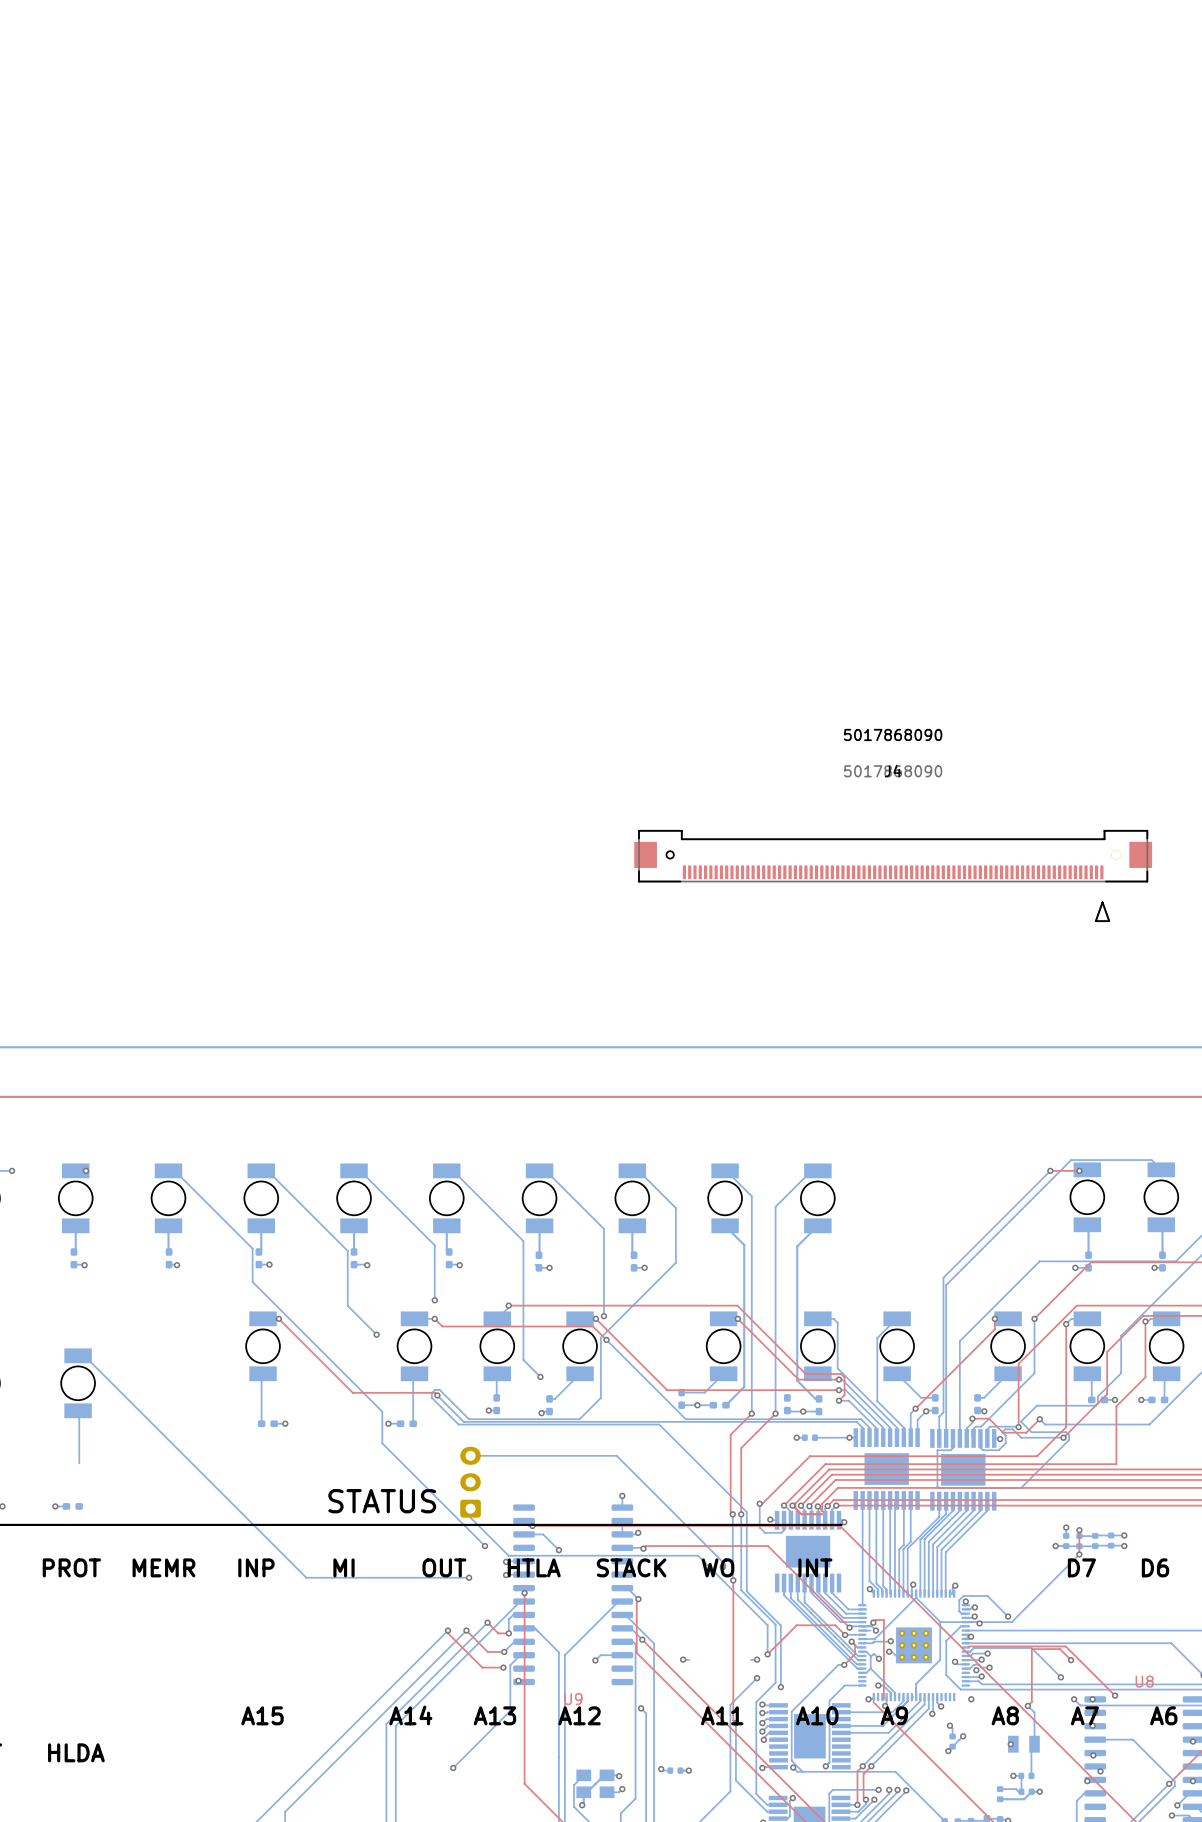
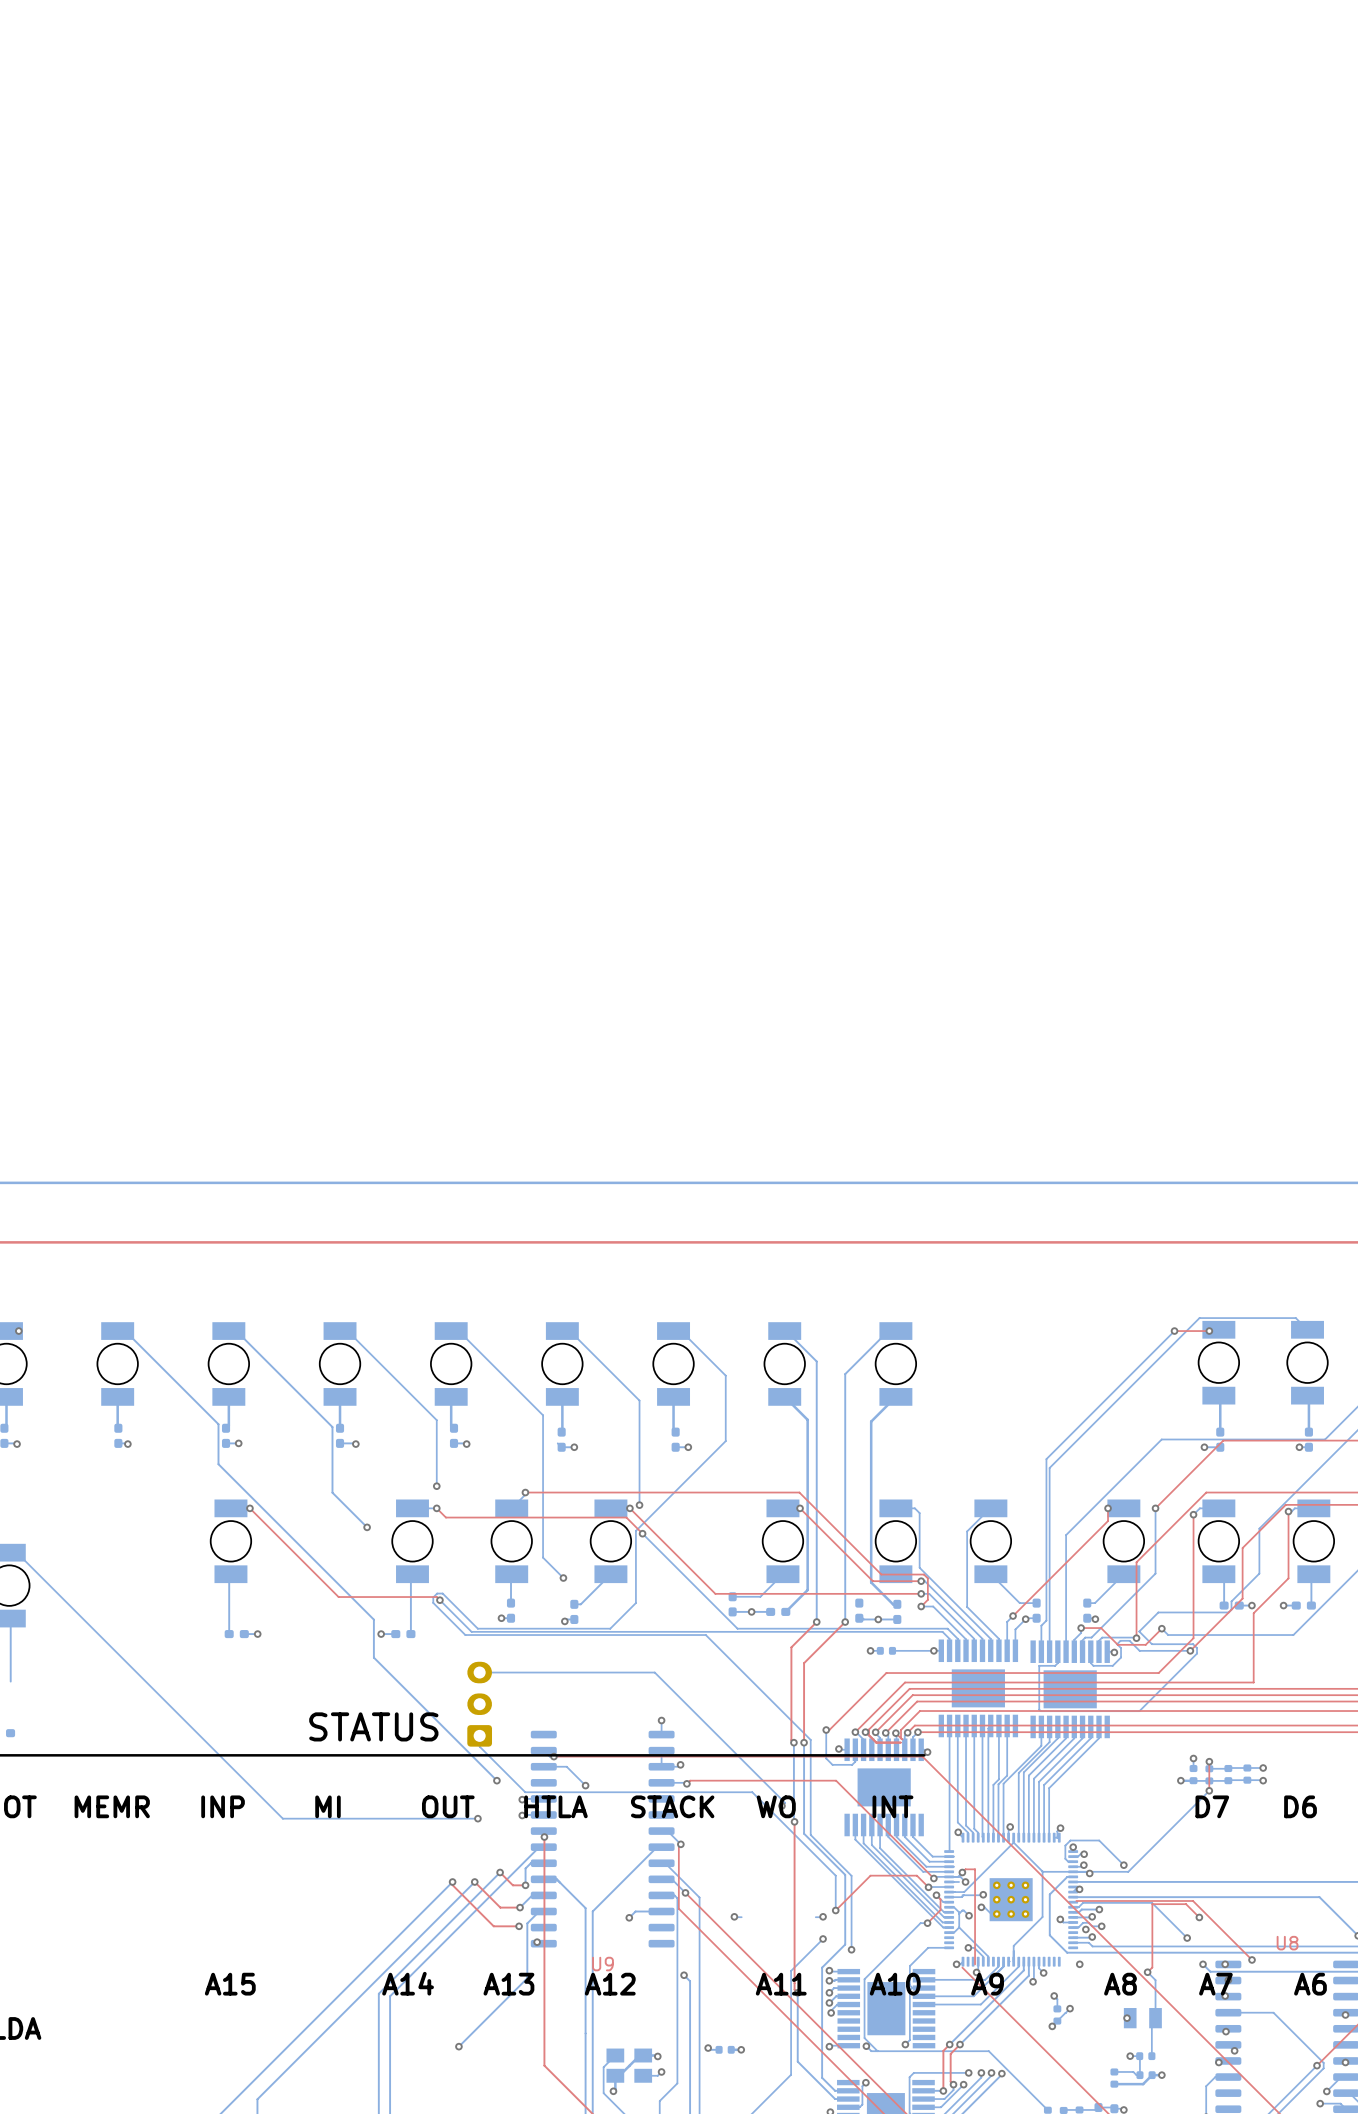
J4: 5017868090 (893, 875) -> none

